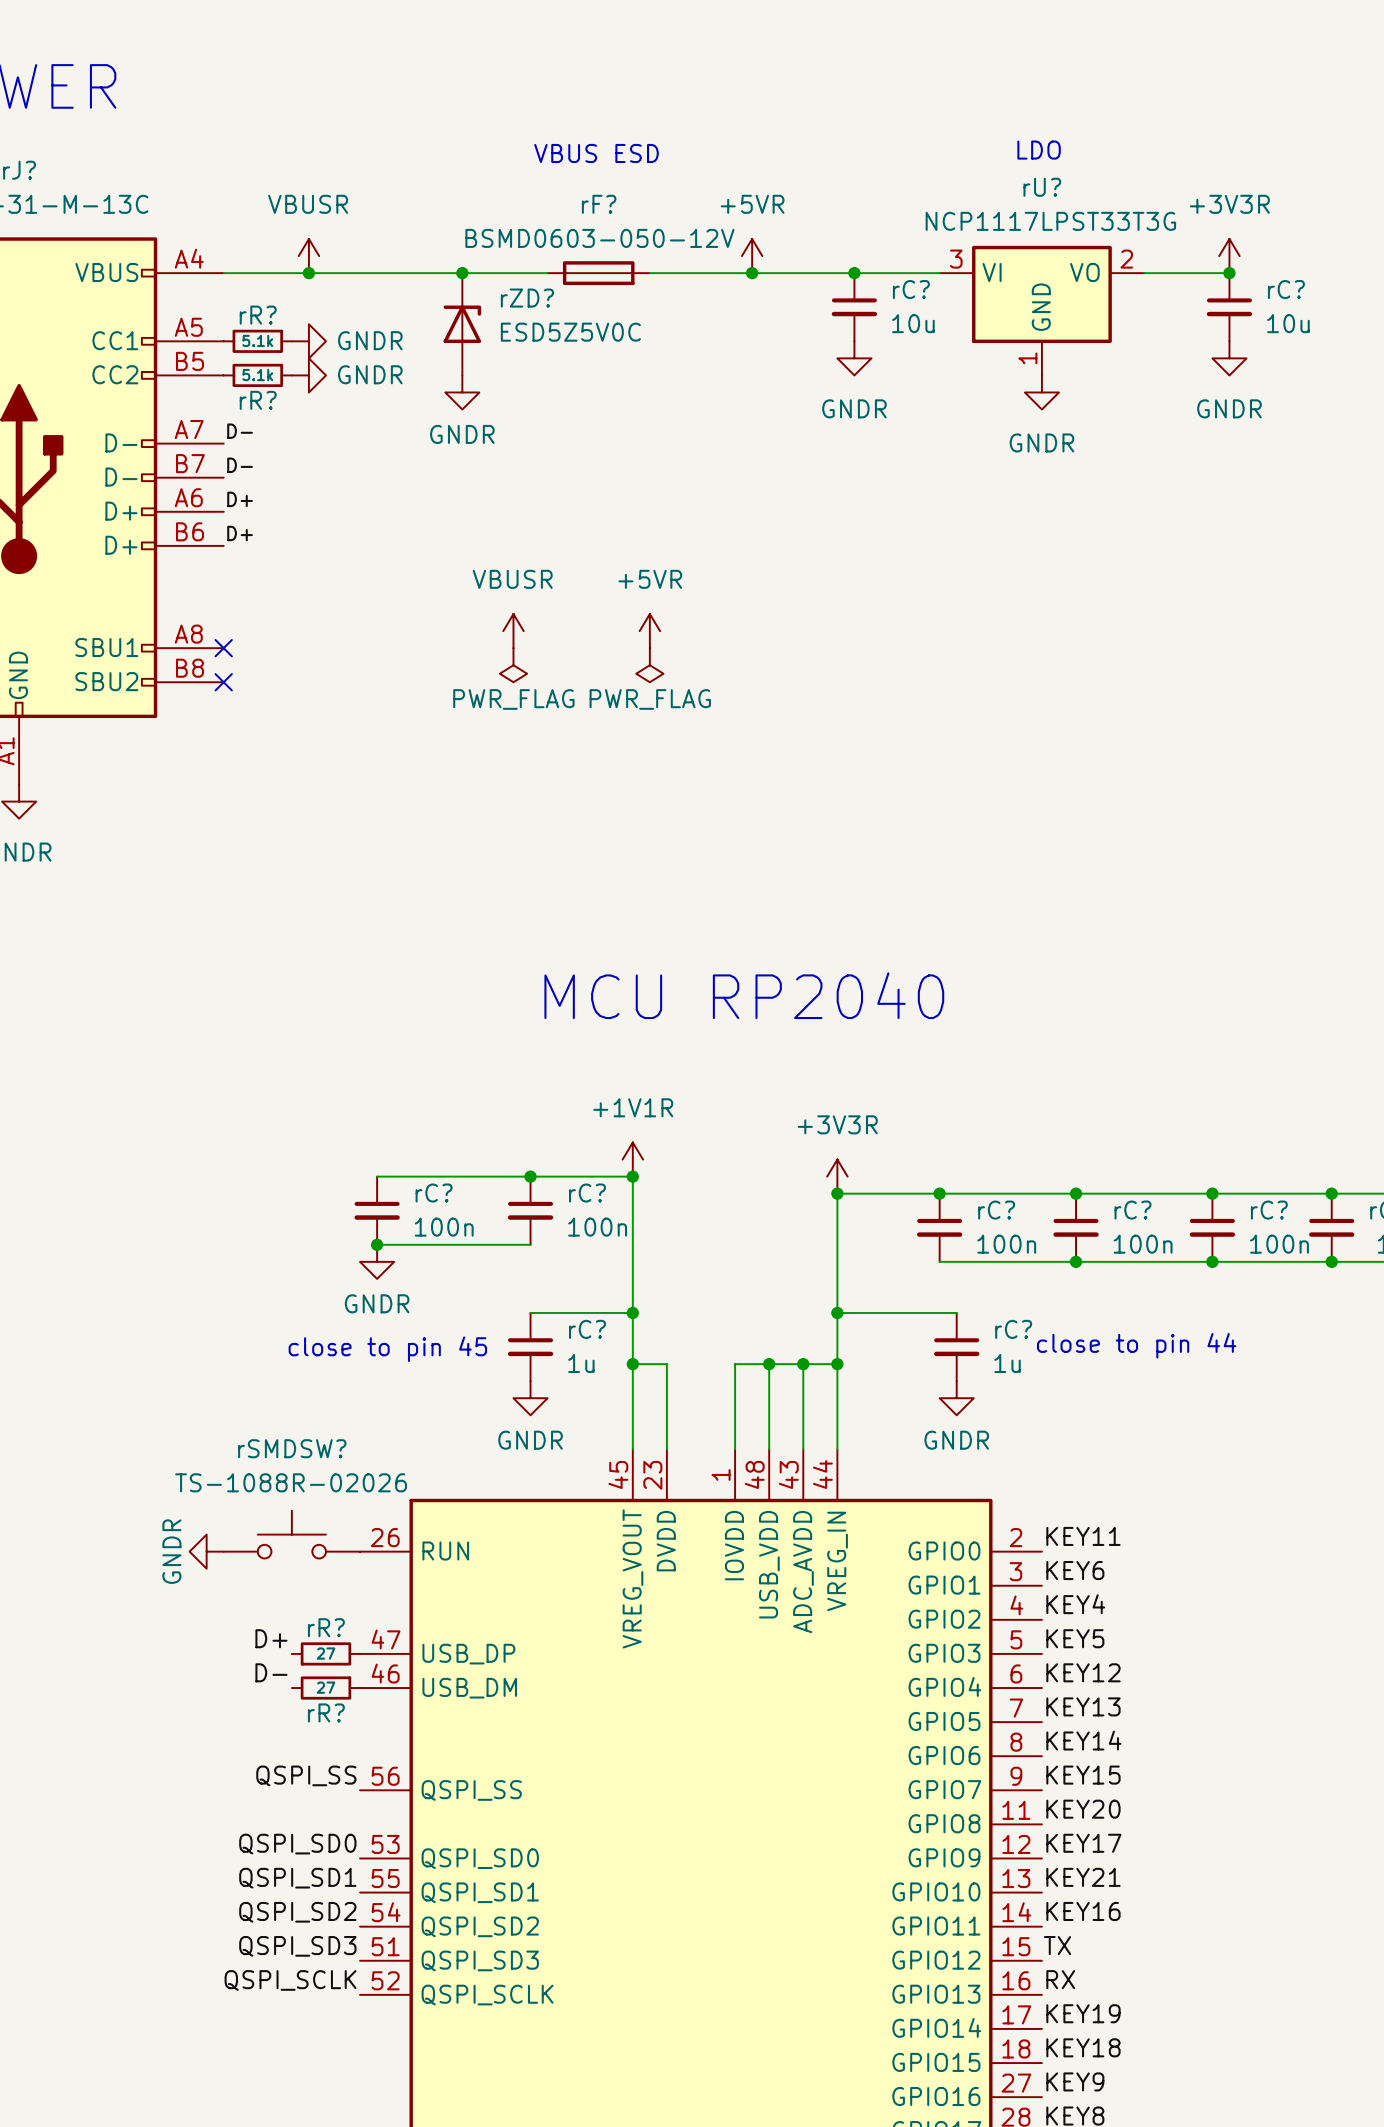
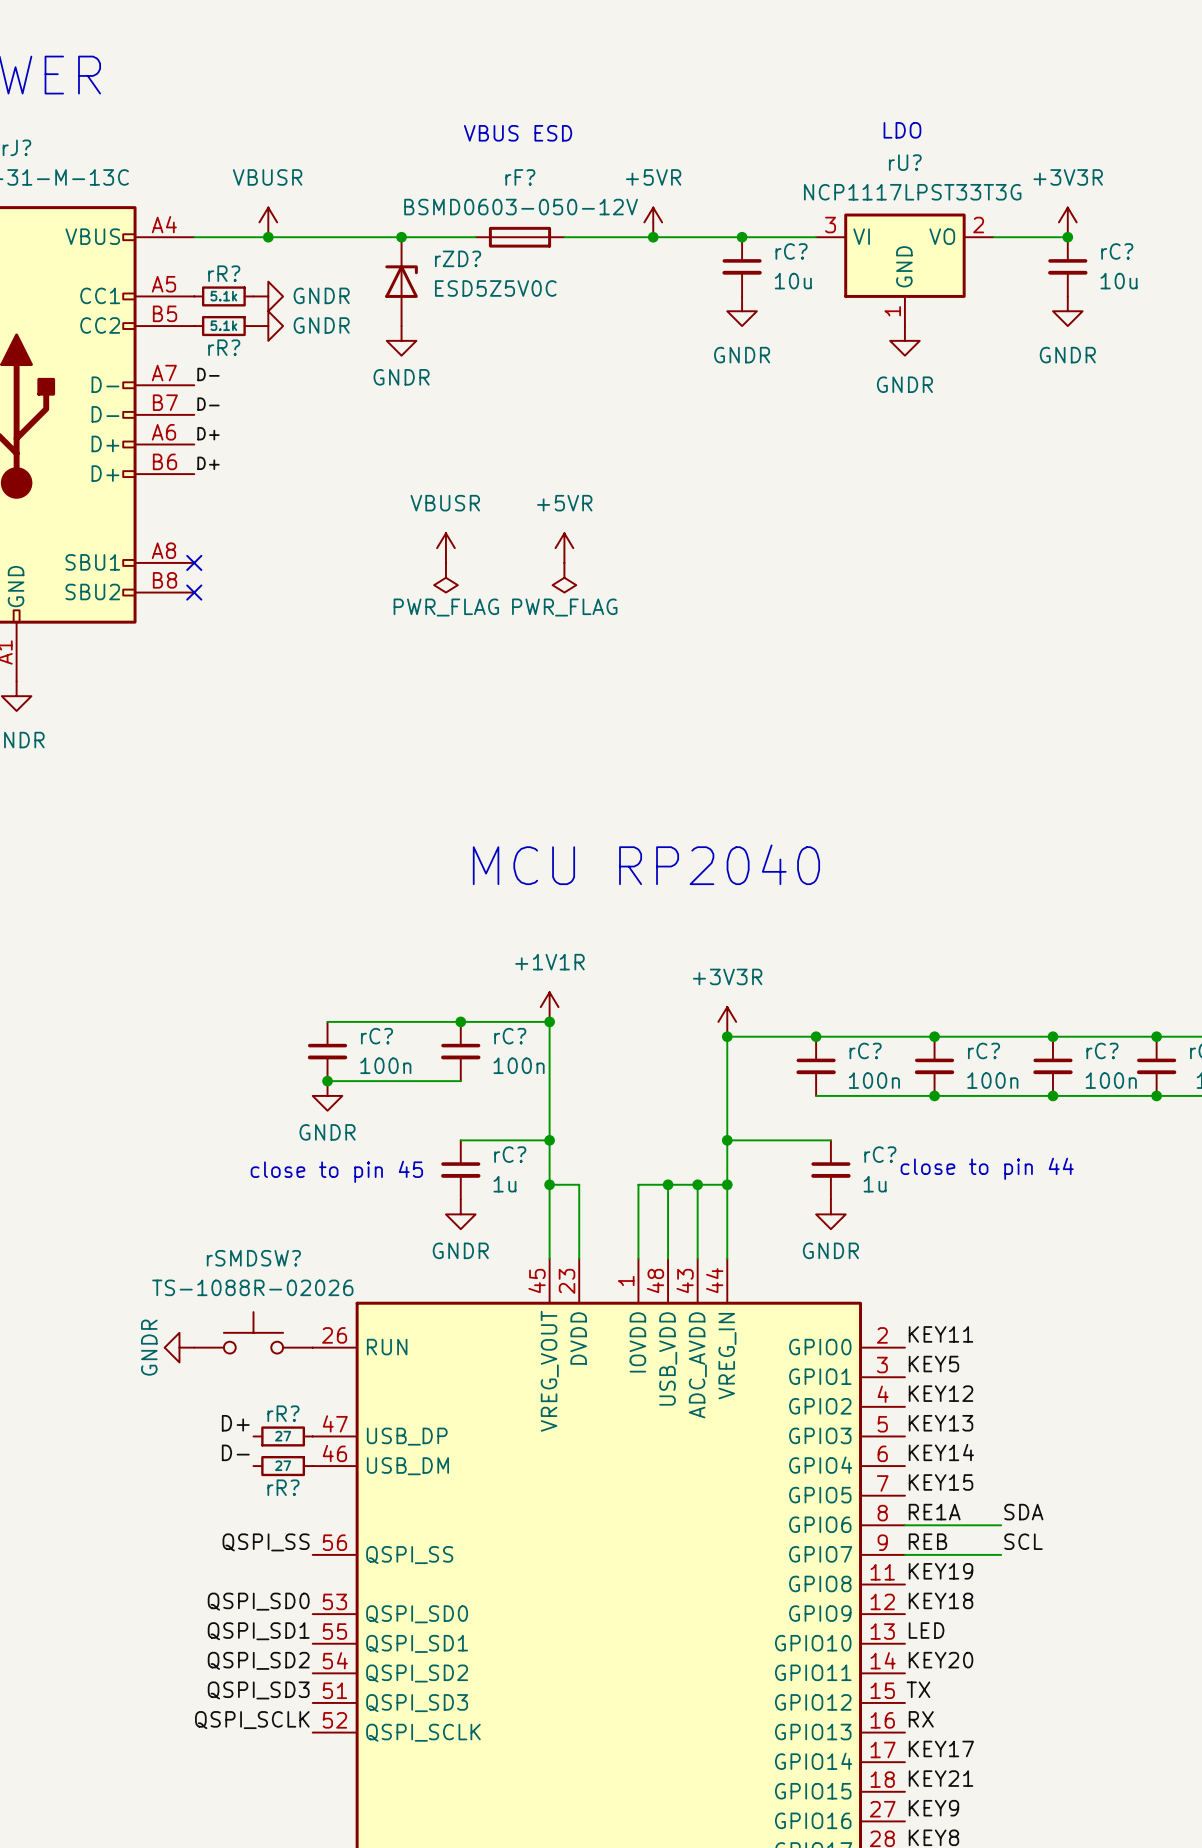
label: KEY6 (1075, 1570) -> KEY5 (933, 1364)
label: KEY4 (1075, 1604) -> KEY12 (941, 1393)
label: KEY5 (1075, 1638) -> KEY13 (941, 1423)
label: KEY12 (1083, 1672) -> KEY14 (941, 1452)
label: KEY13 (1083, 1706) -> KEY15 (941, 1482)
label: KEY14 (1083, 1740) -> RE1A (934, 1512)
label: none -> SDA (1023, 1512)
wire: none -> (904, 1525) (1001, 1525)
label: KEY15 (1083, 1775) -> REB (927, 1541)
label: none -> SCL (1023, 1541)
wire: none -> (904, 1554) (1001, 1554)
label: KEY20 (1083, 1809) -> KEY19 (941, 1571)
label: KEY17 (1083, 1843) -> KEY18 (941, 1600)
label: KEY21 (1083, 1877) -> LED (926, 1630)
label: KEY16 (1083, 1911) -> KEY20 (941, 1660)
label: KEY19 (1083, 2013) -> KEY17 (941, 1748)
label: KEY18 (1083, 2047) -> KEY21 (941, 1778)

